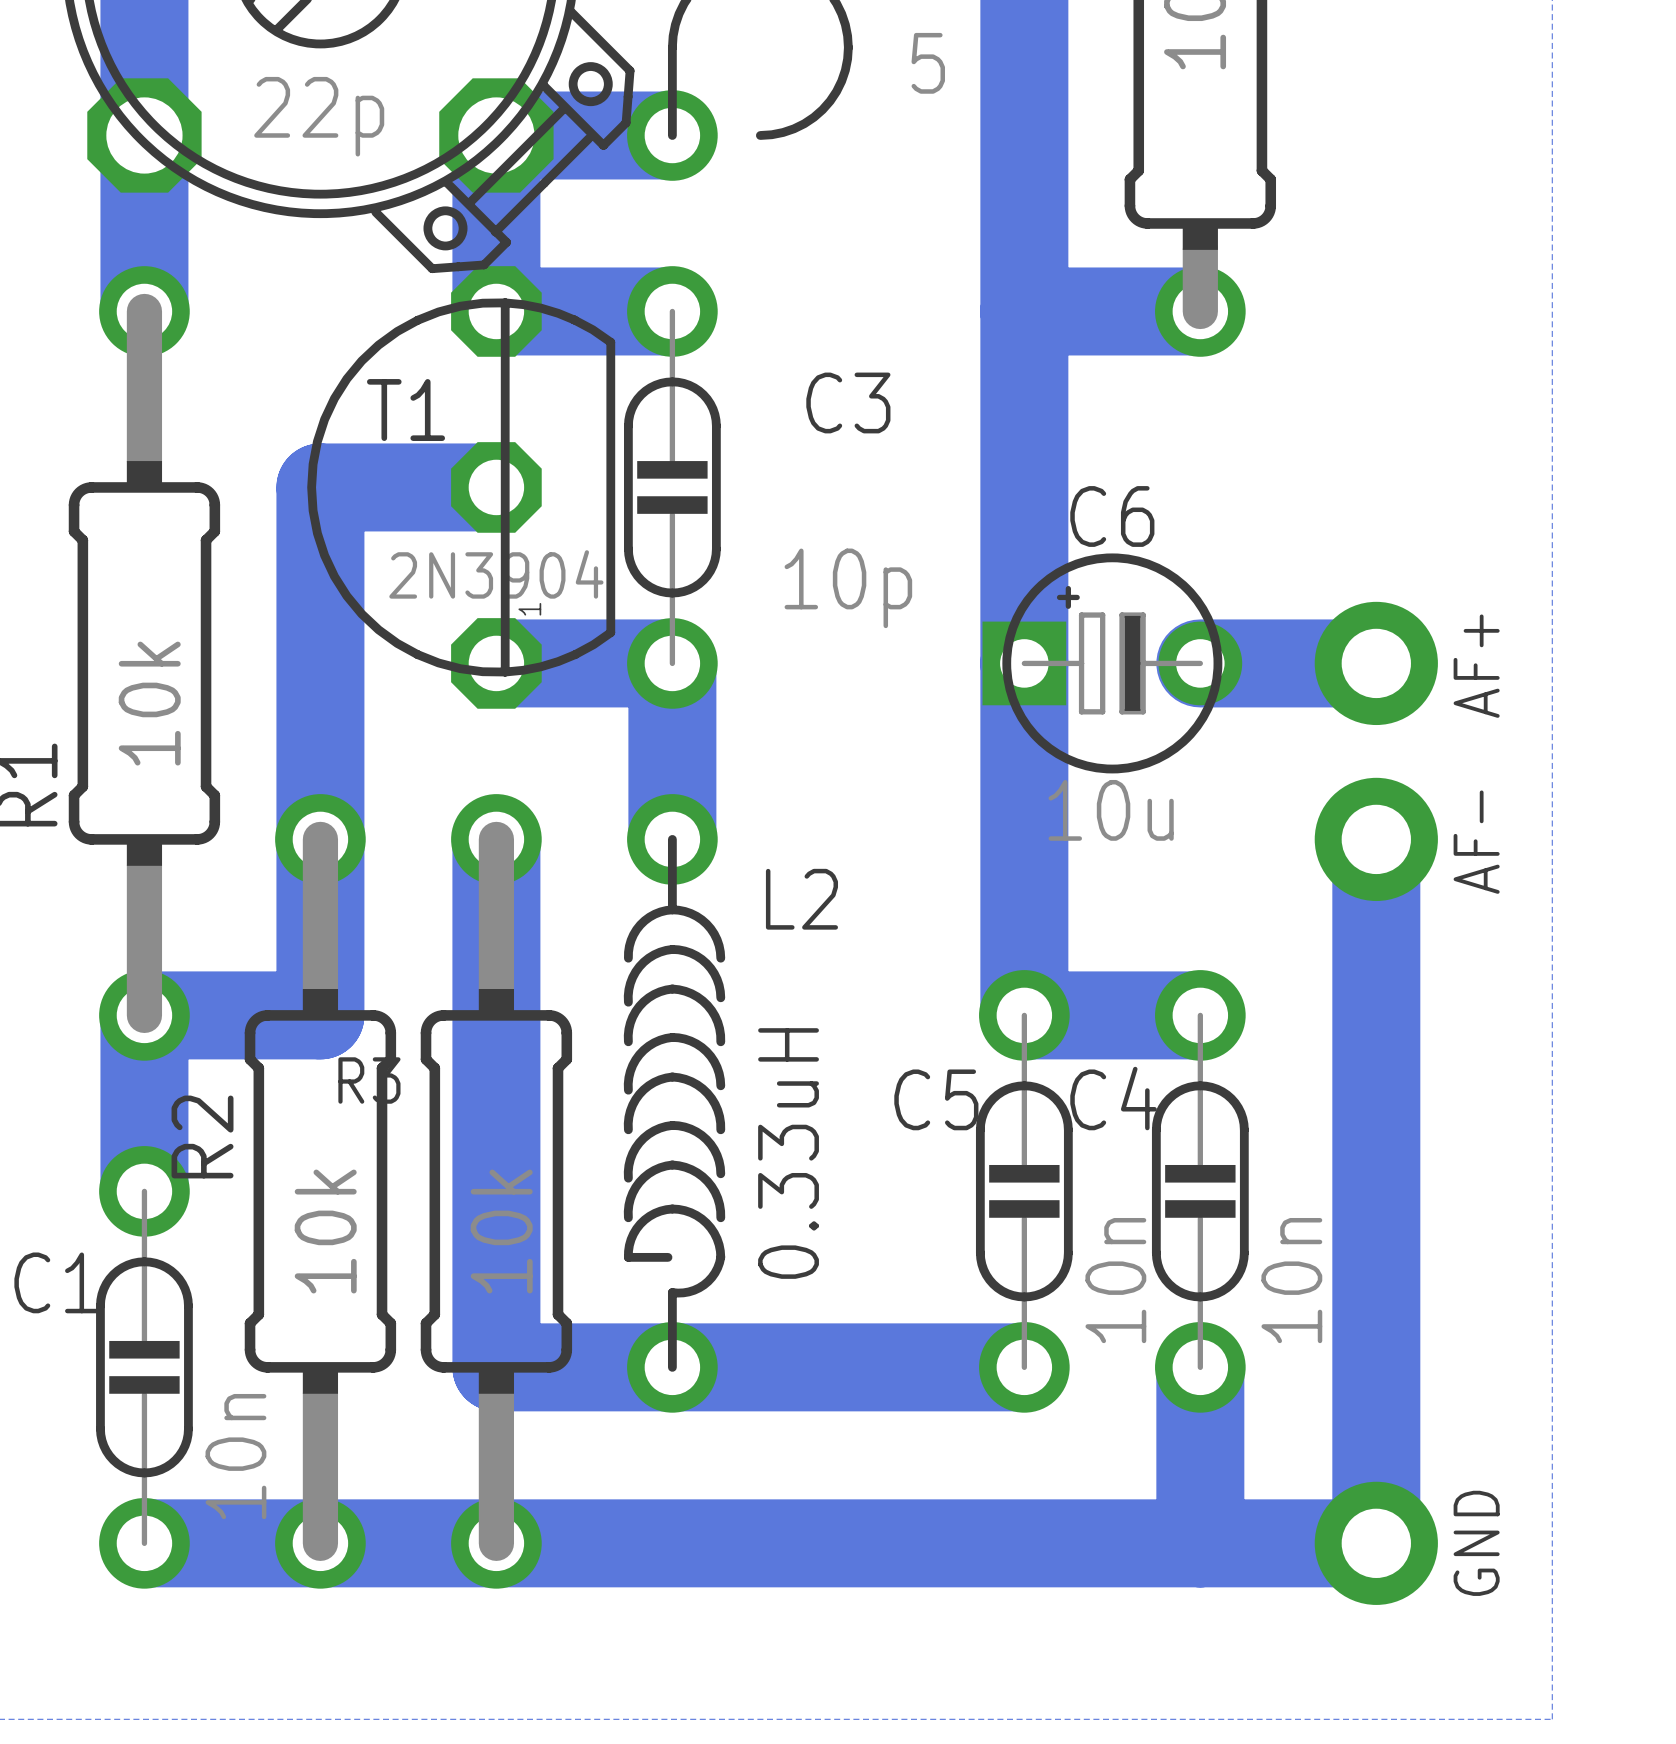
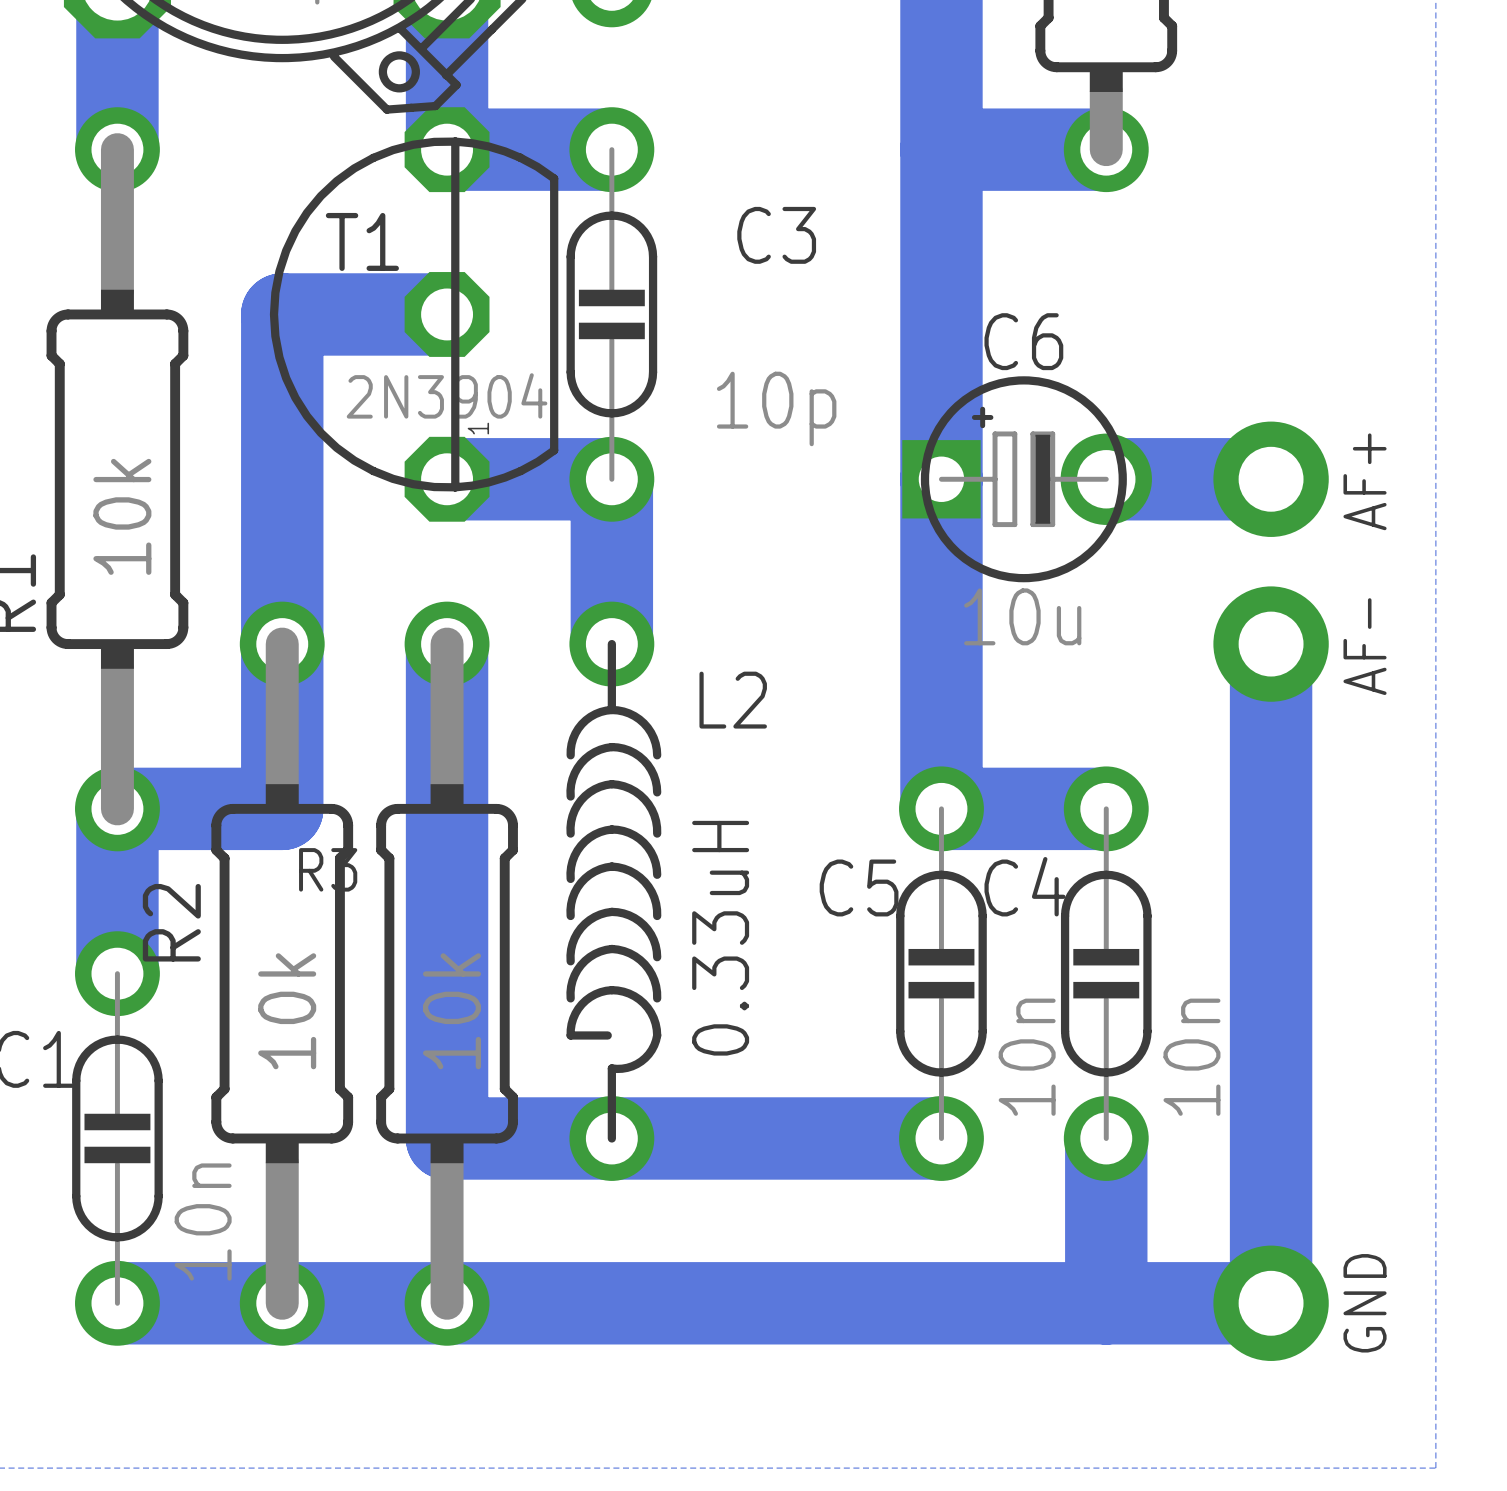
C6 footprint: [982, 553, 1243, 774] -> [902, 376, 1152, 583]

